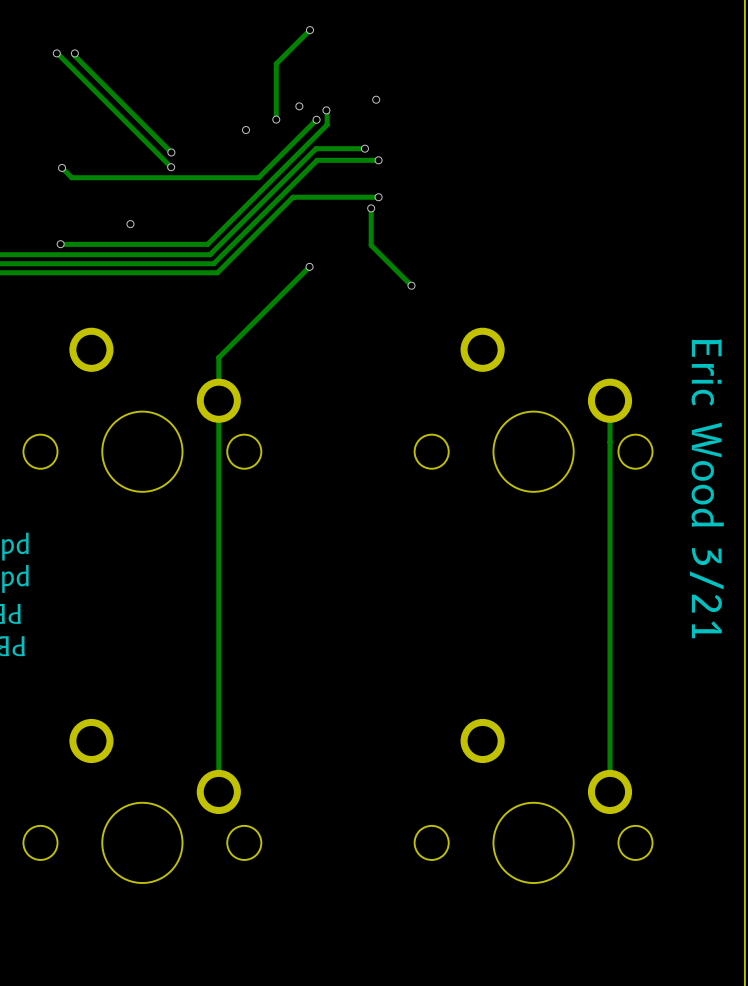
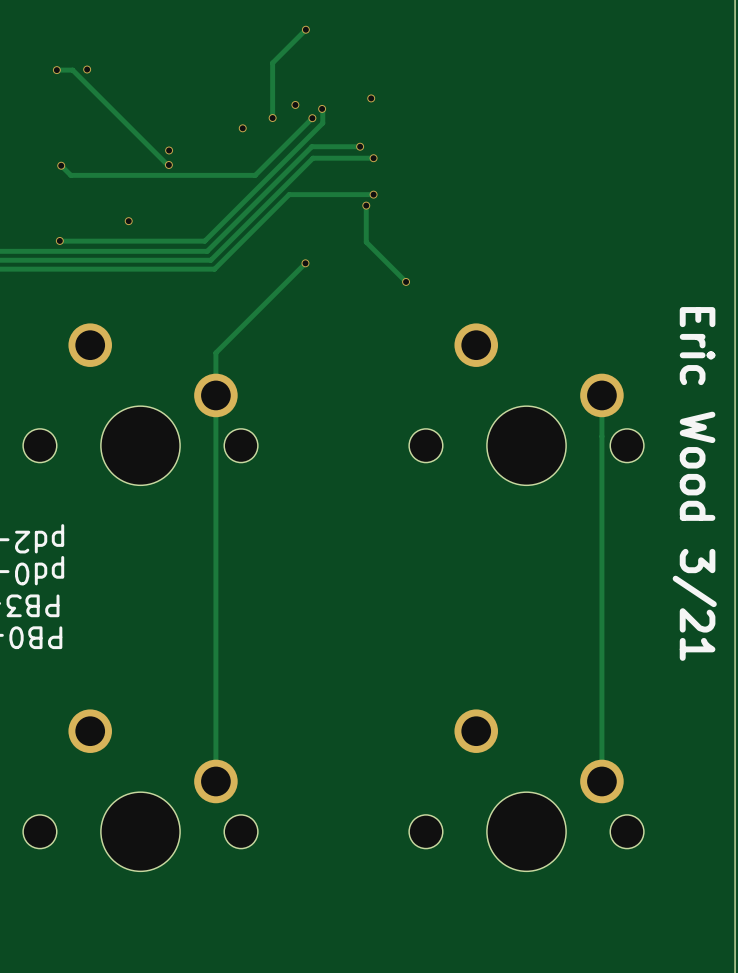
track: (56, 53) (171, 167) -> none
via: (56, 53) -> none
track: (74, 53) (74, 56) (171, 152) -> none
via: (74, 53) -> none
via: none -> (87, 69)
track: none -> (56, 70) (72, 70) (167, 164)
via: none -> (56, 70)

